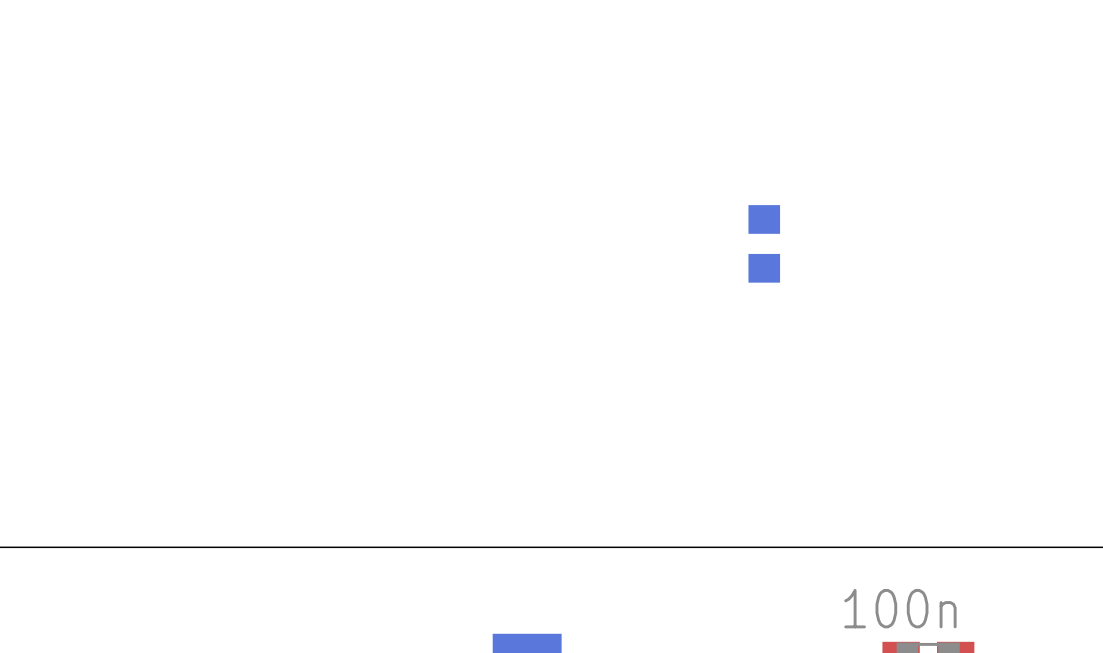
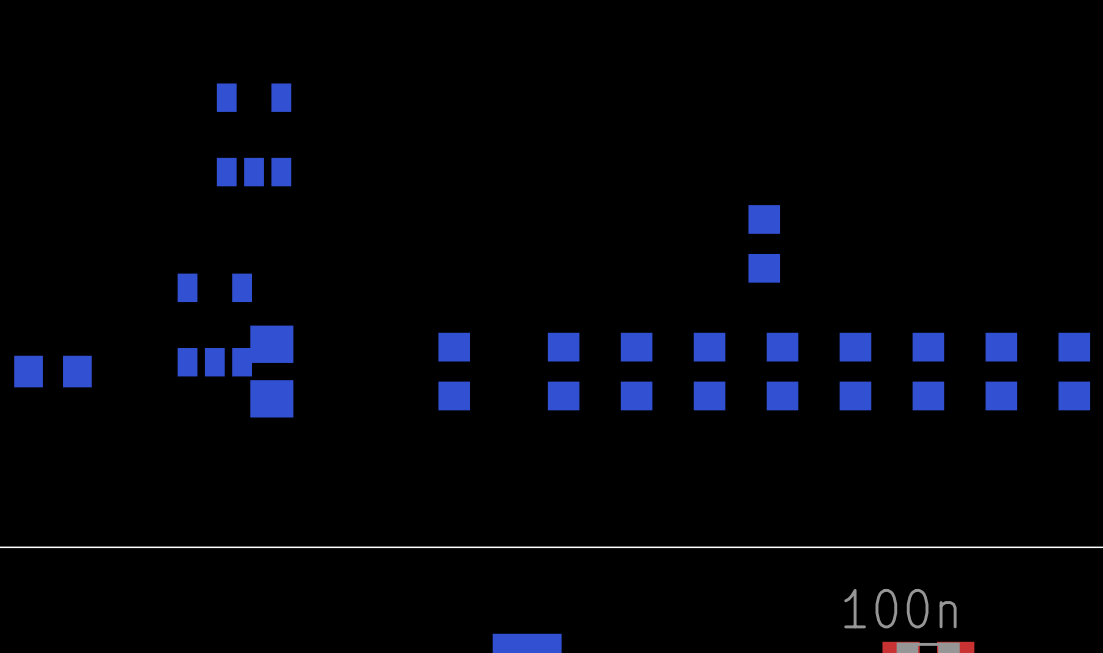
part: none -> (254, 134)
part: none -> (214, 325)
part: none -> (52, 371)
part: none -> (271, 371)
part: none -> (454, 371)
part: none -> (563, 371)
part: none -> (636, 371)
part: none -> (709, 371)
part: none -> (782, 371)
part: none -> (855, 371)
part: none -> (928, 371)
part: none -> (1001, 371)
part: none -> (1074, 371)

